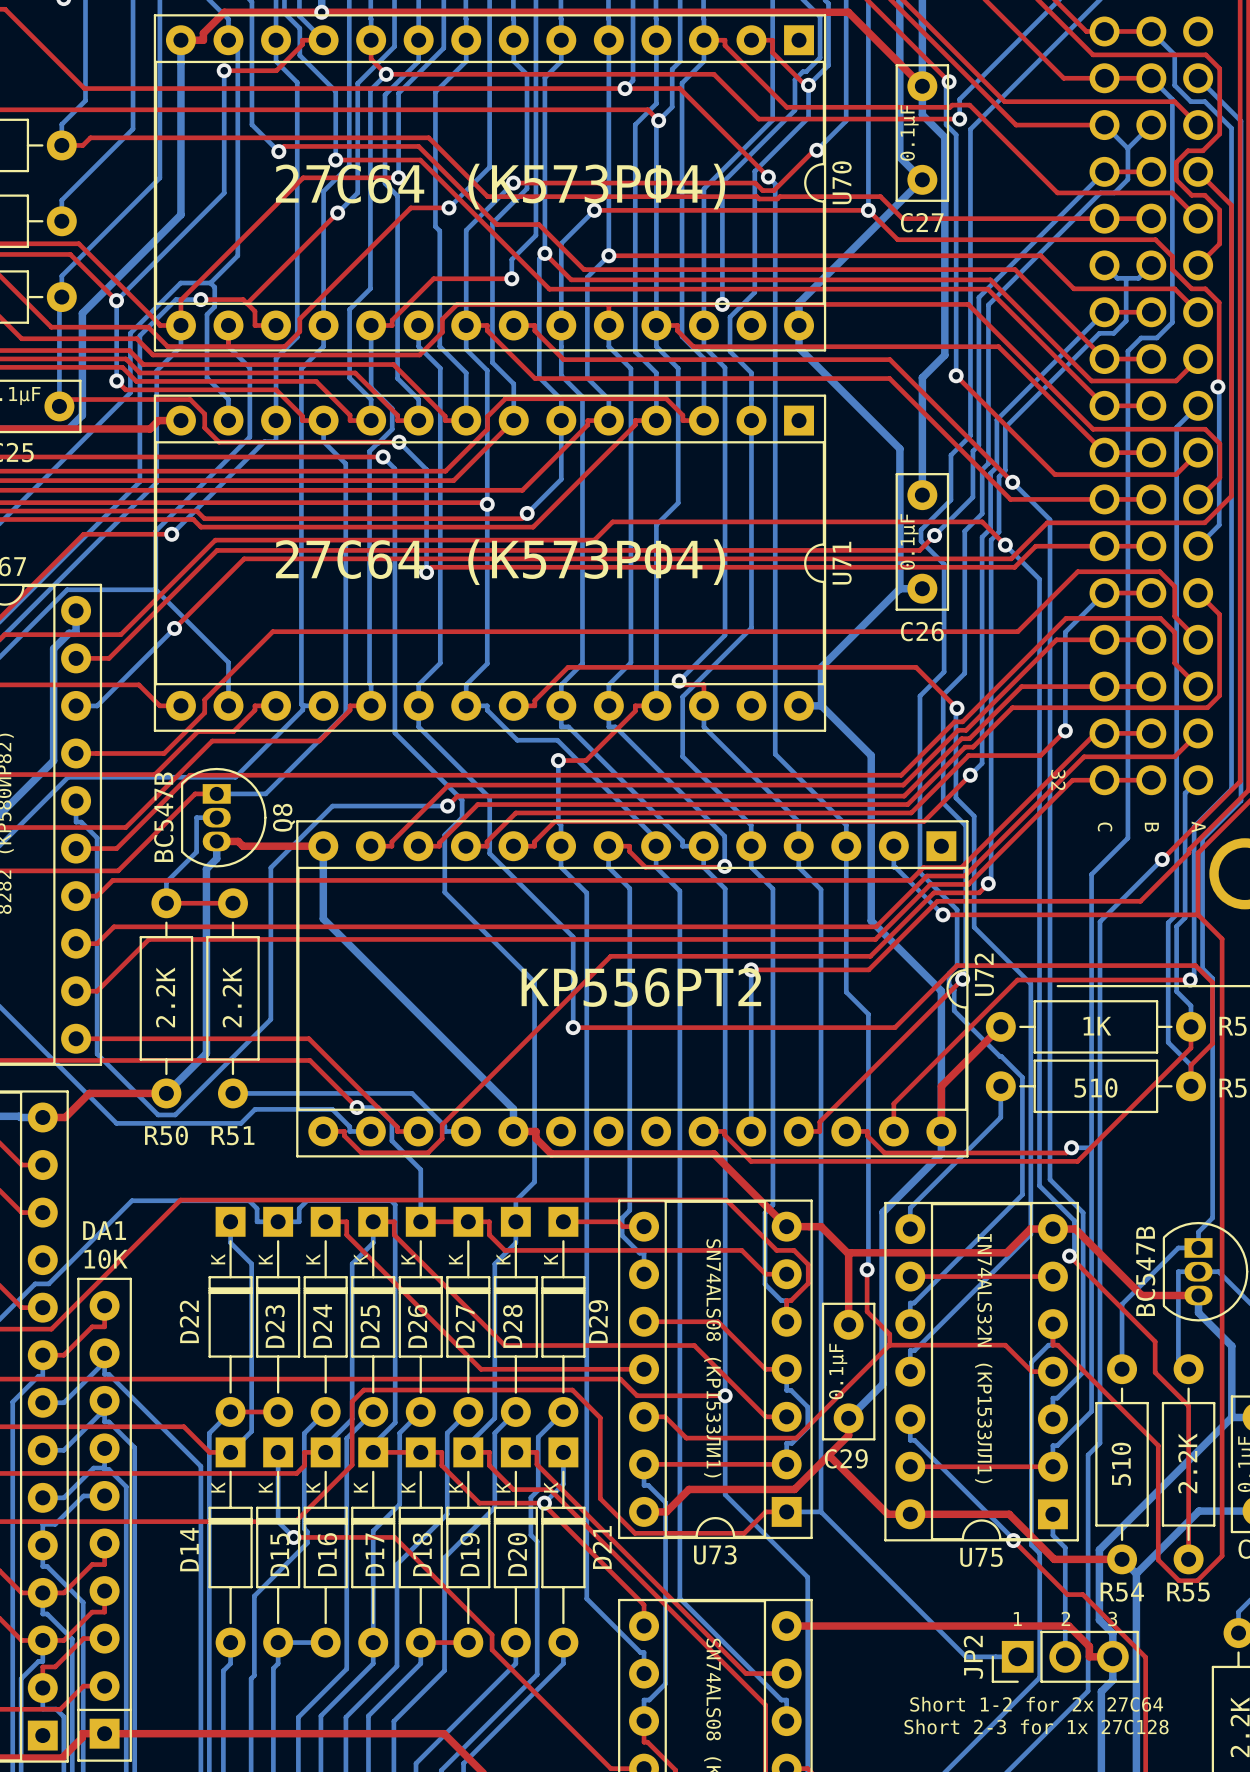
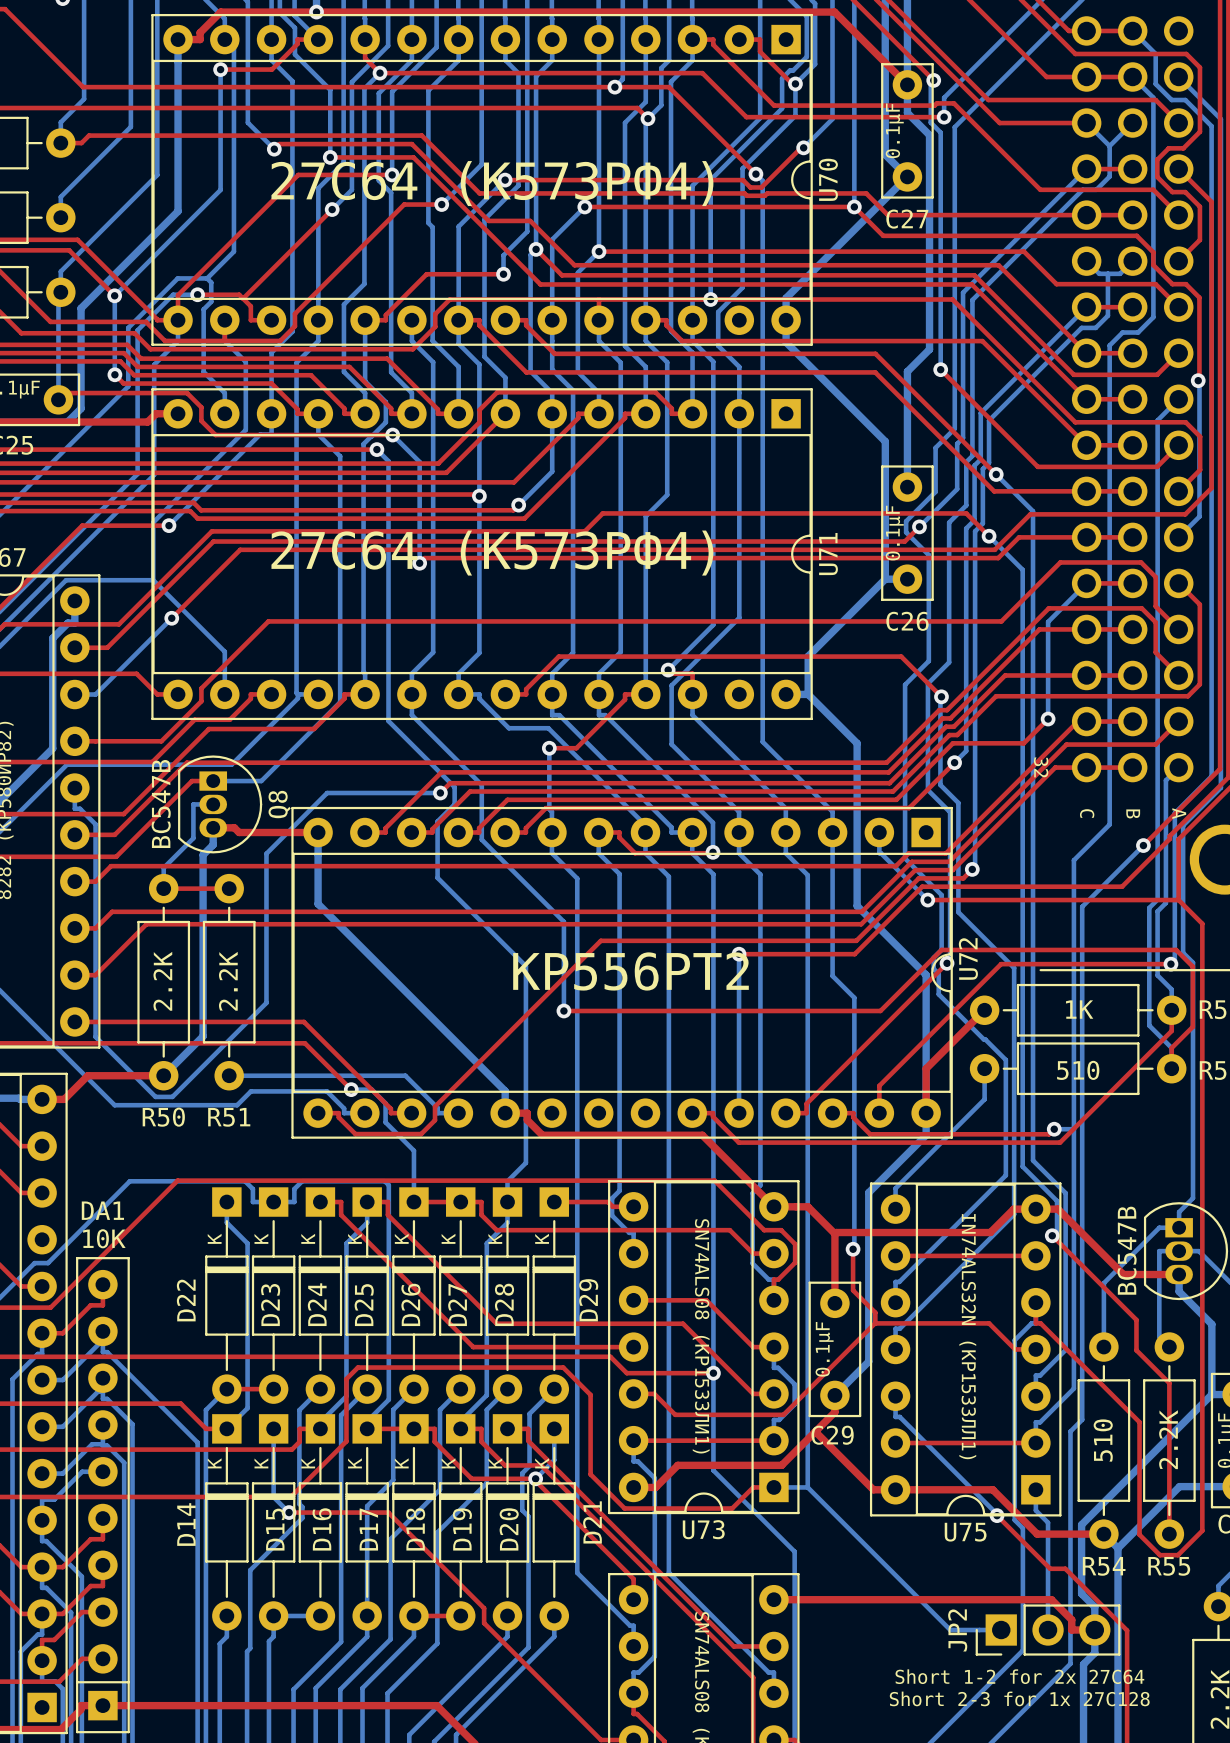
text: 2 (1065, 1618) -> none
text: 1 (1017, 1619) -> none
text: 3 (1112, 1619) -> none

